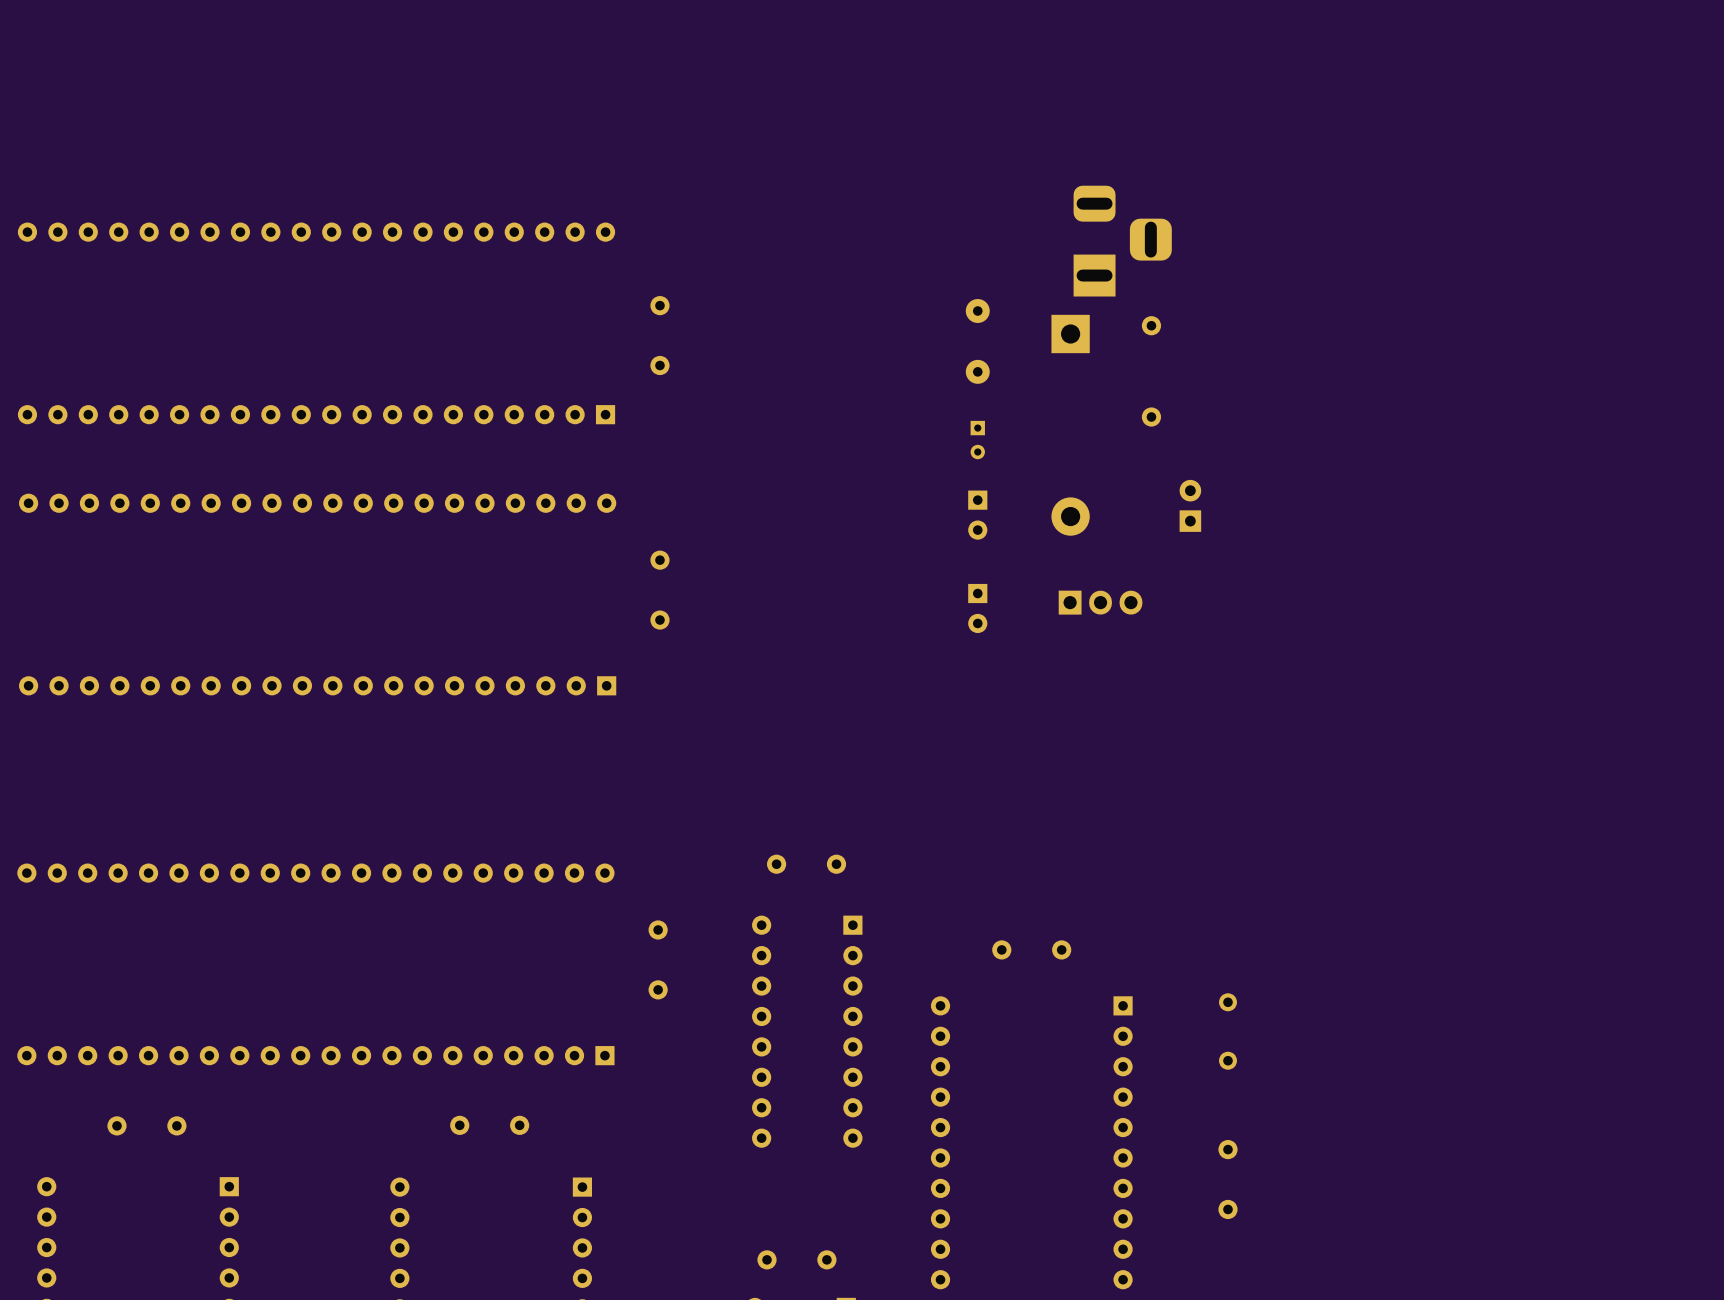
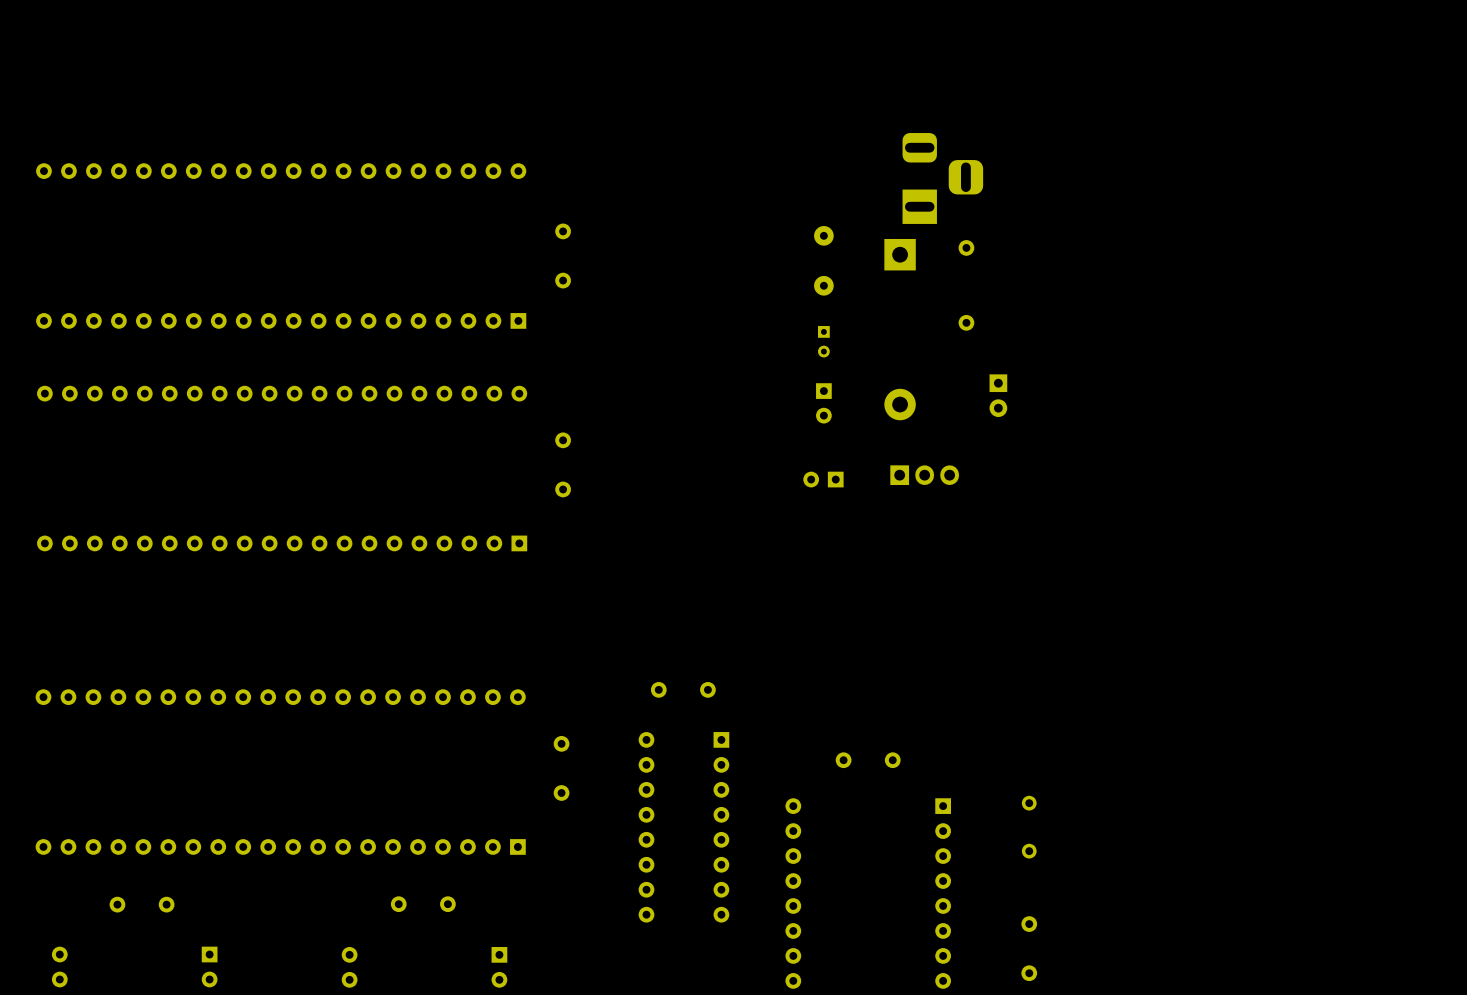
part rotation: 0° (1190, 505) -> 180° (998, 395)
part rotation: 0° (977, 608) -> 90° clockwise (823, 479)

